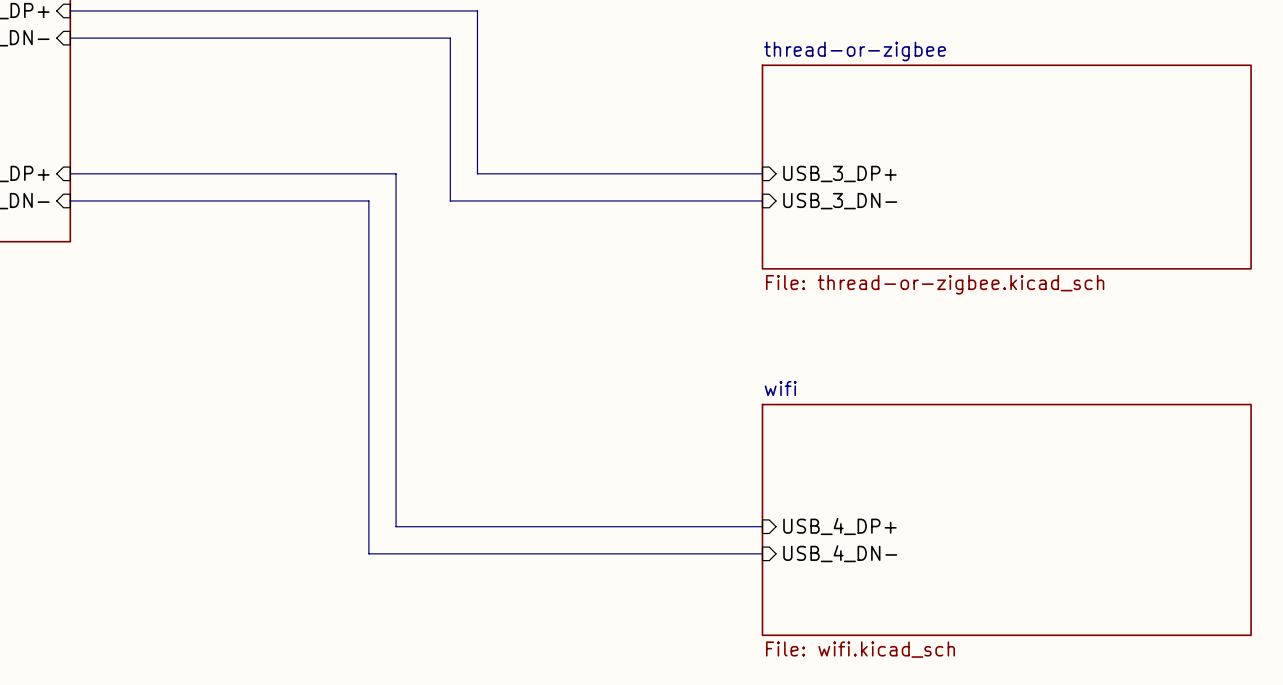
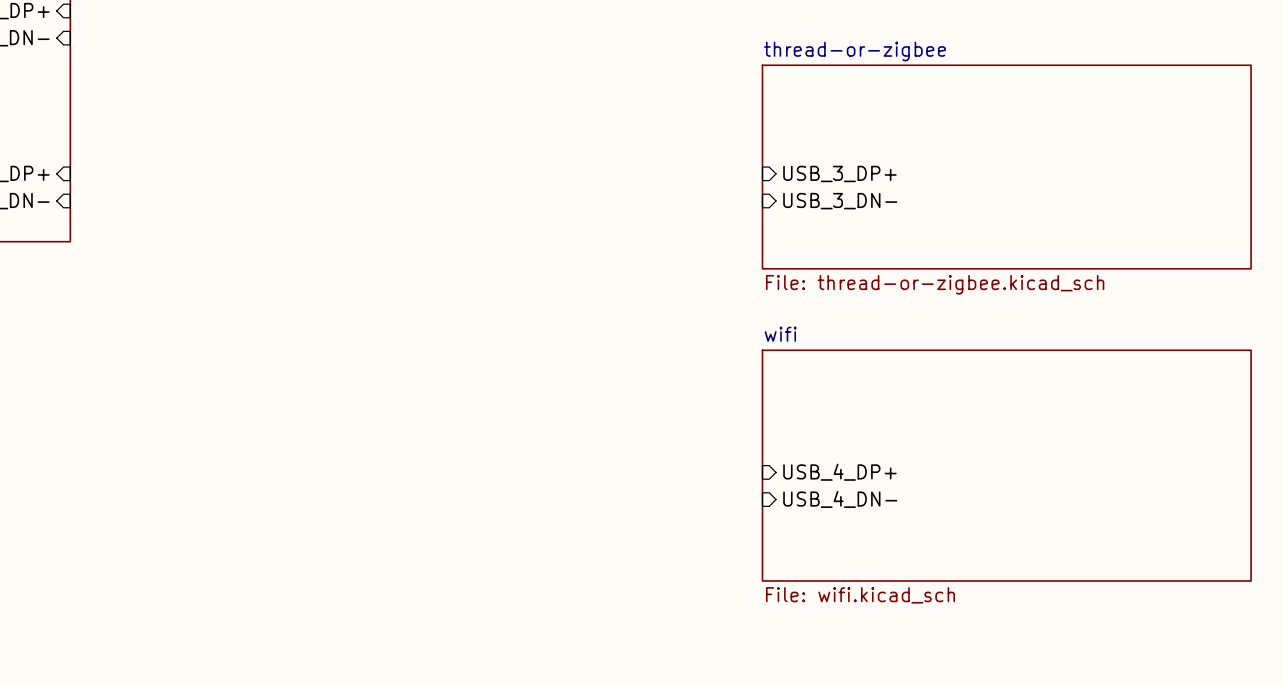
wire: (70, 10) (477, 10) (477, 173) (762, 173) -> none
wire: (70, 38) (450, 38) (450, 200) (762, 200) -> none
wire: (70, 173) (396, 173) (396, 526) (762, 526) -> none
wire: (70, 200) (368, 200) (368, 553) (762, 553) -> none
sheet wifi position: (1006, 519) -> (1006, 465)
sheet pin position: USB_4_DP+ (839, 526) -> USB_4_DP+ (839, 472)
sheet pin position: USB_4_DN- (840, 553) -> USB_4_DN- (840, 499)

